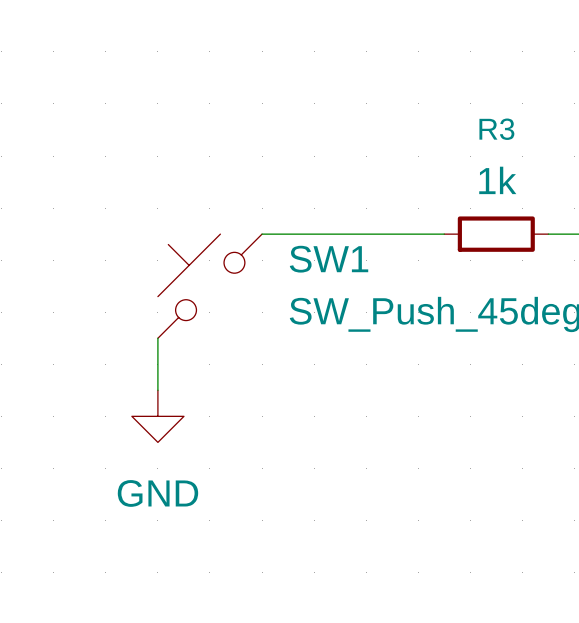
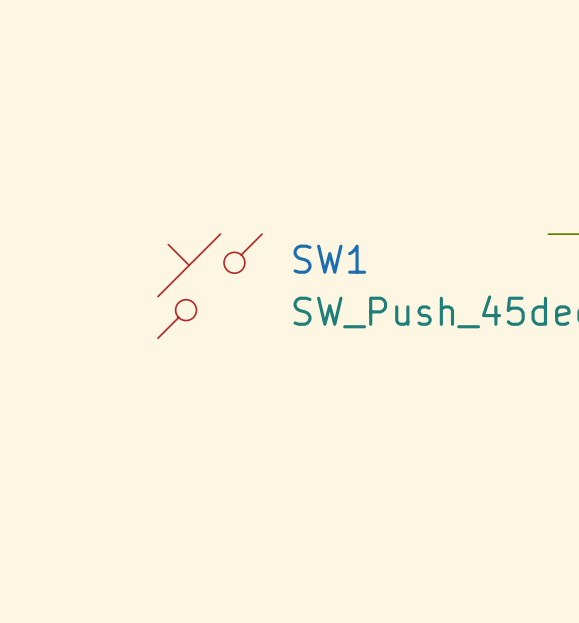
wire: (262, 234) (444, 234) -> none
R3: 1k (496, 234) -> none
wire: (157, 338) (157, 390) -> none
power symbol: GND (157, 416) -> none

